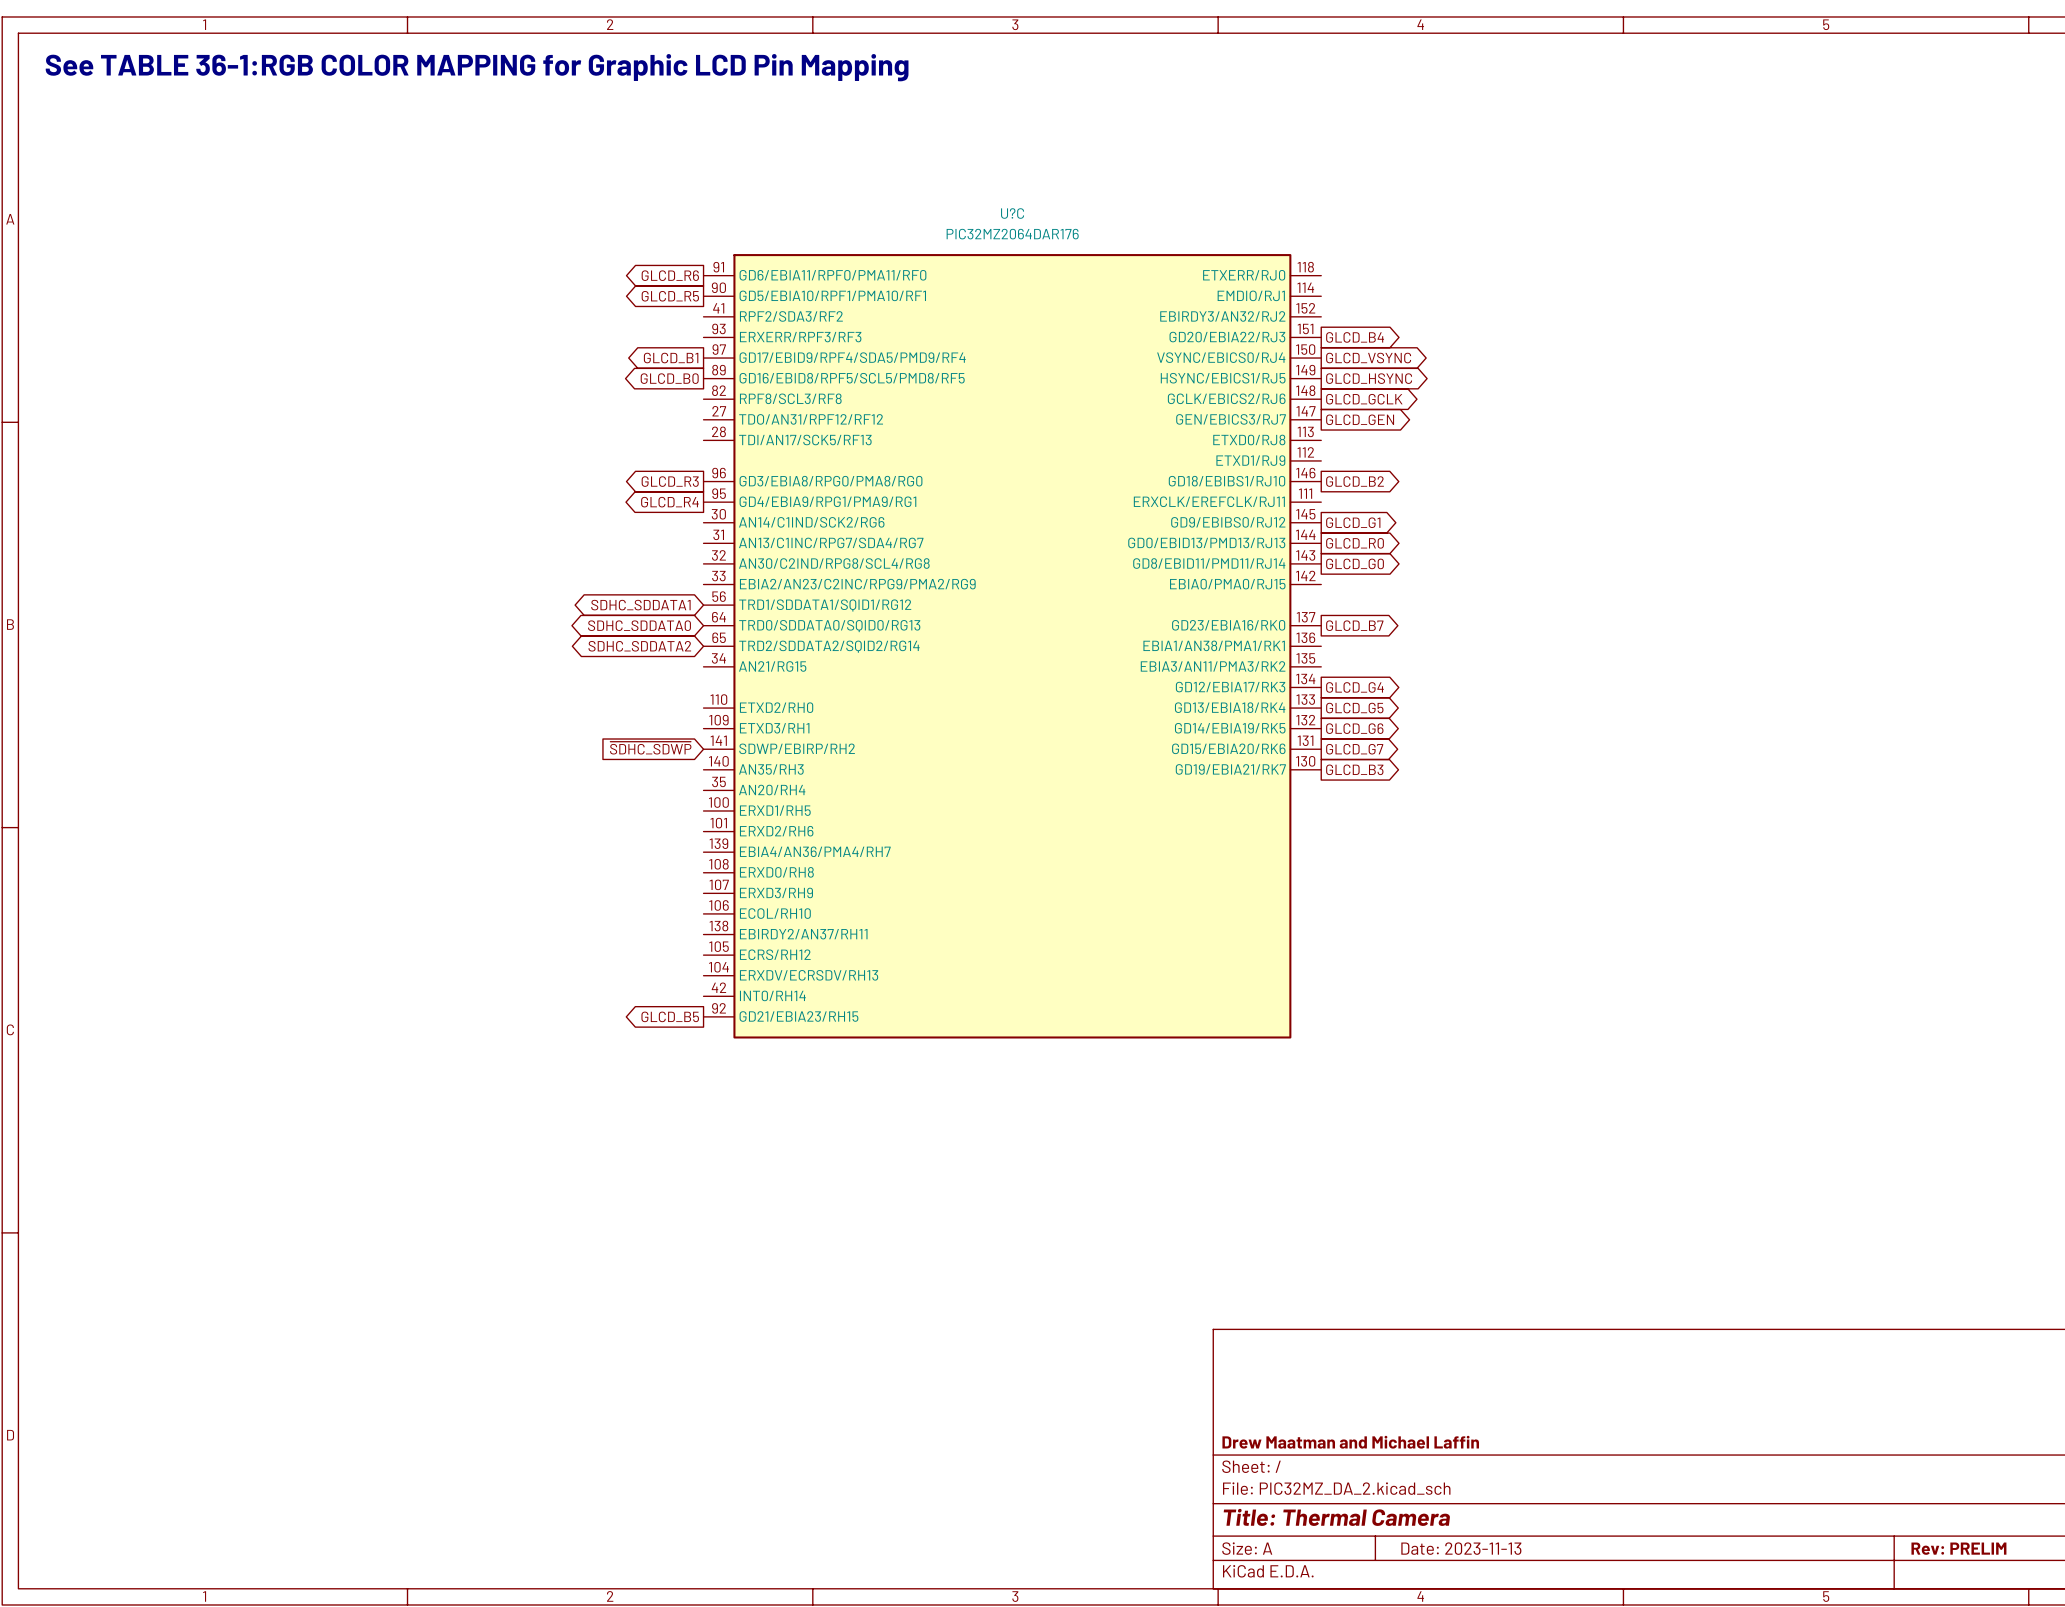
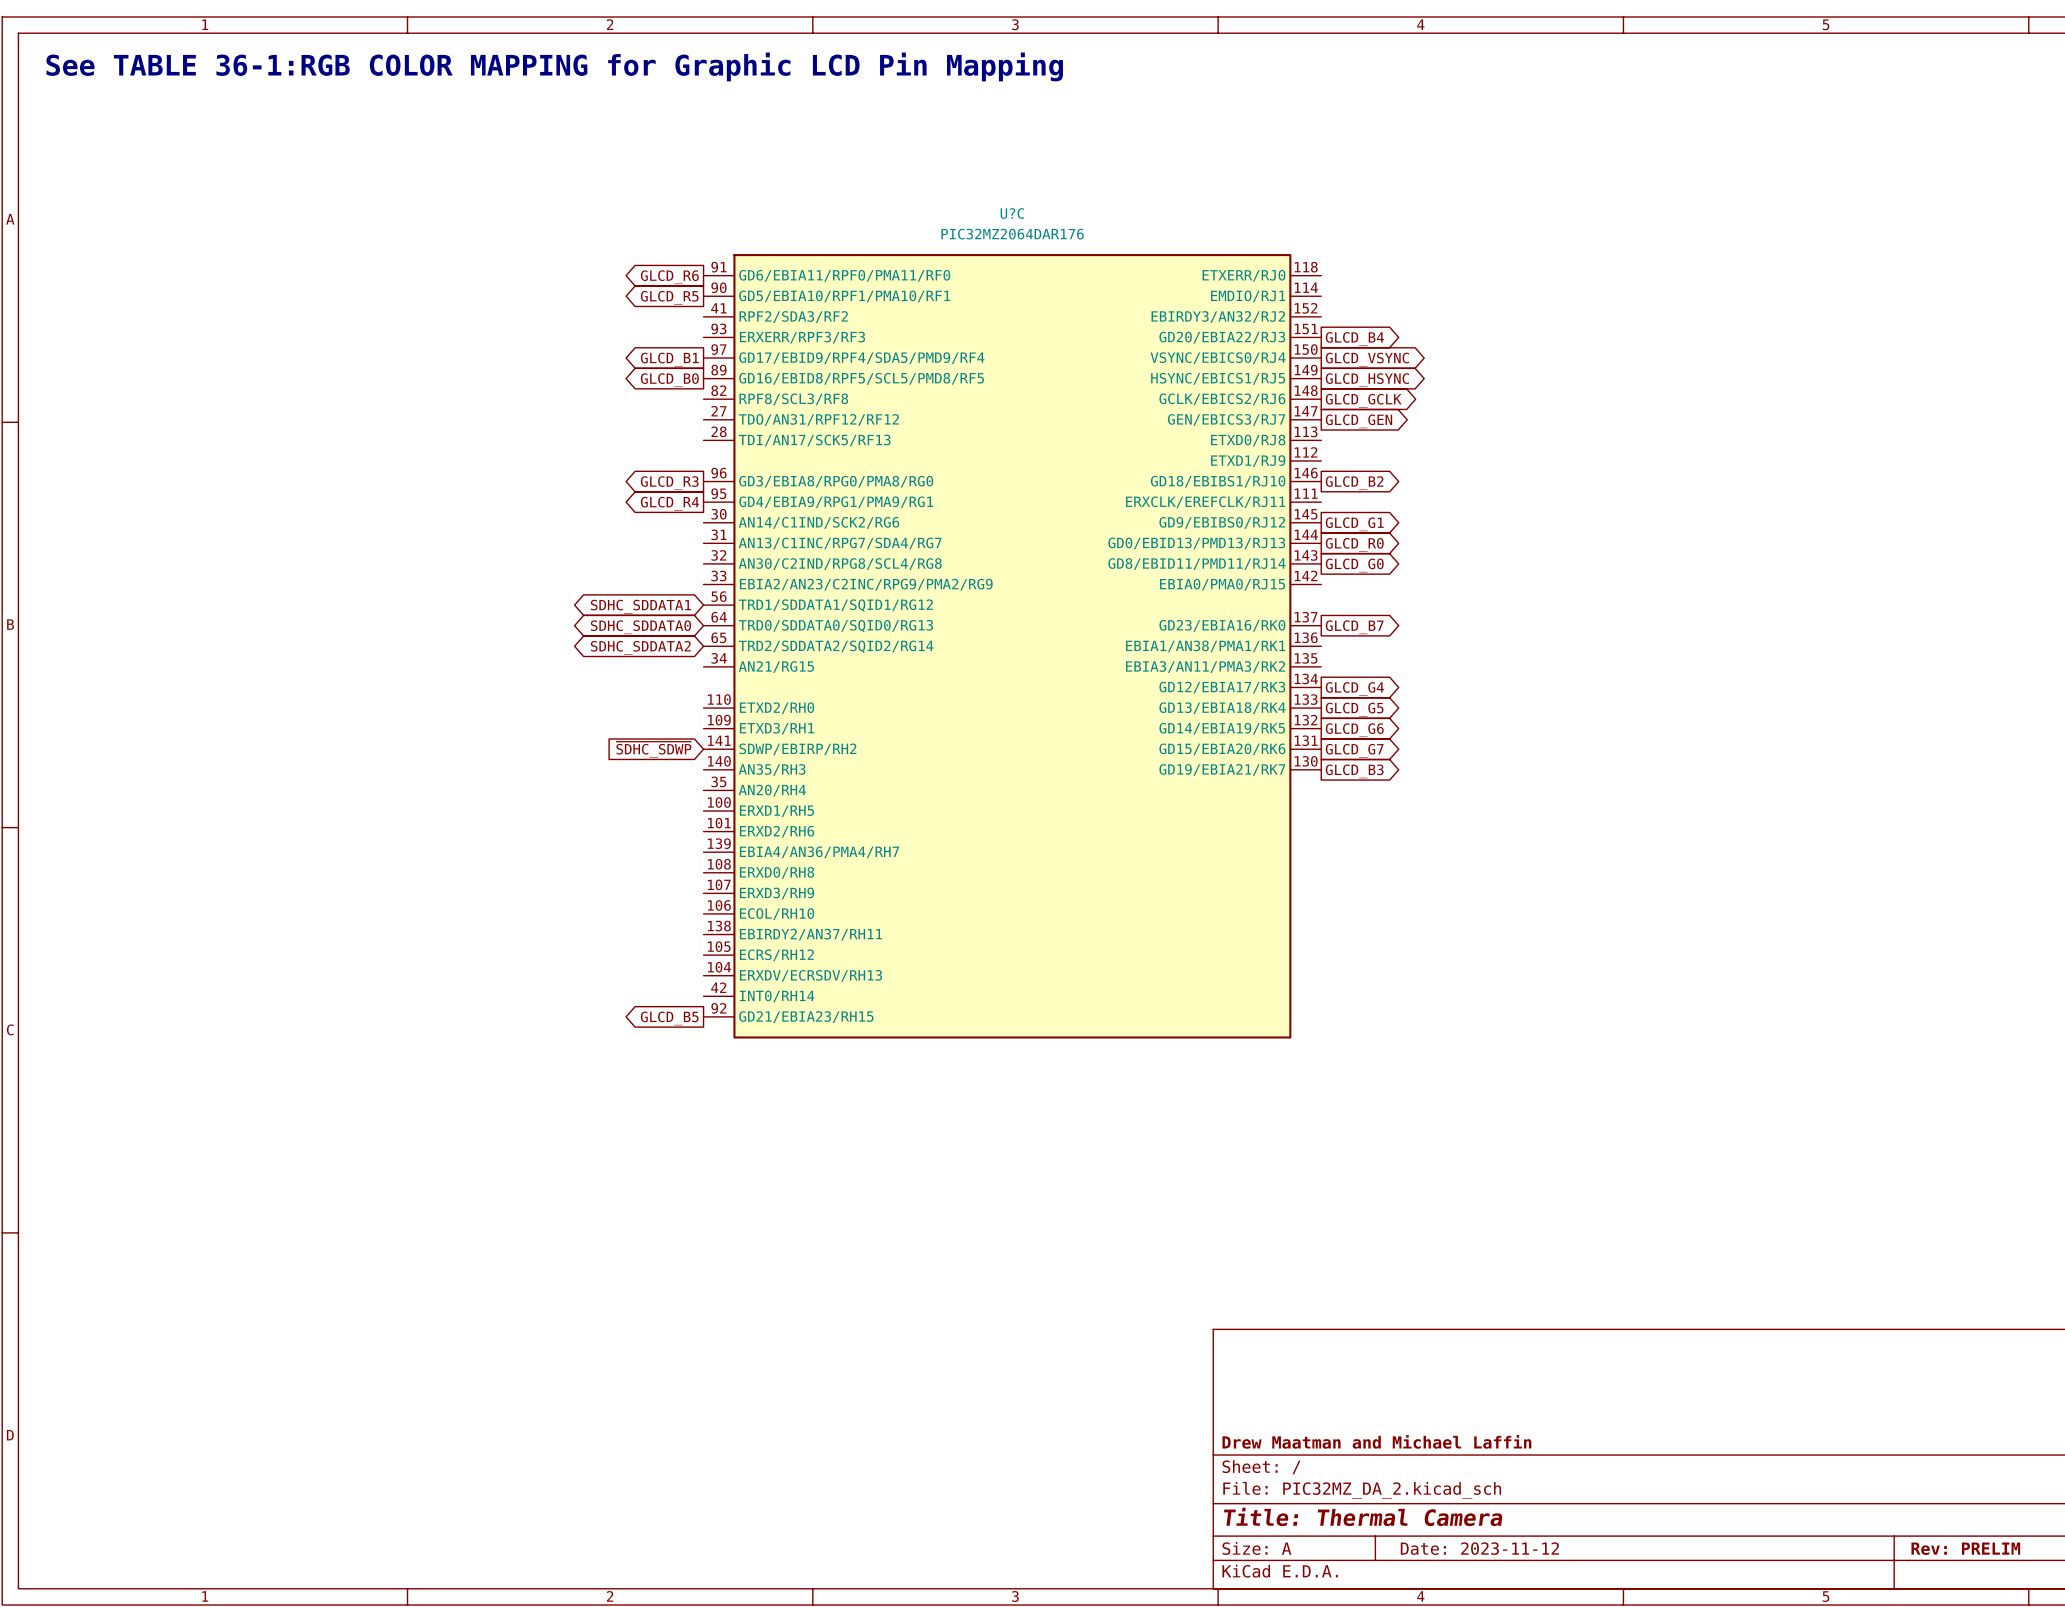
title block: Date: 2023-11-13 (1461, 1548) -> Date: 2023-11-12 (1479, 1548)

